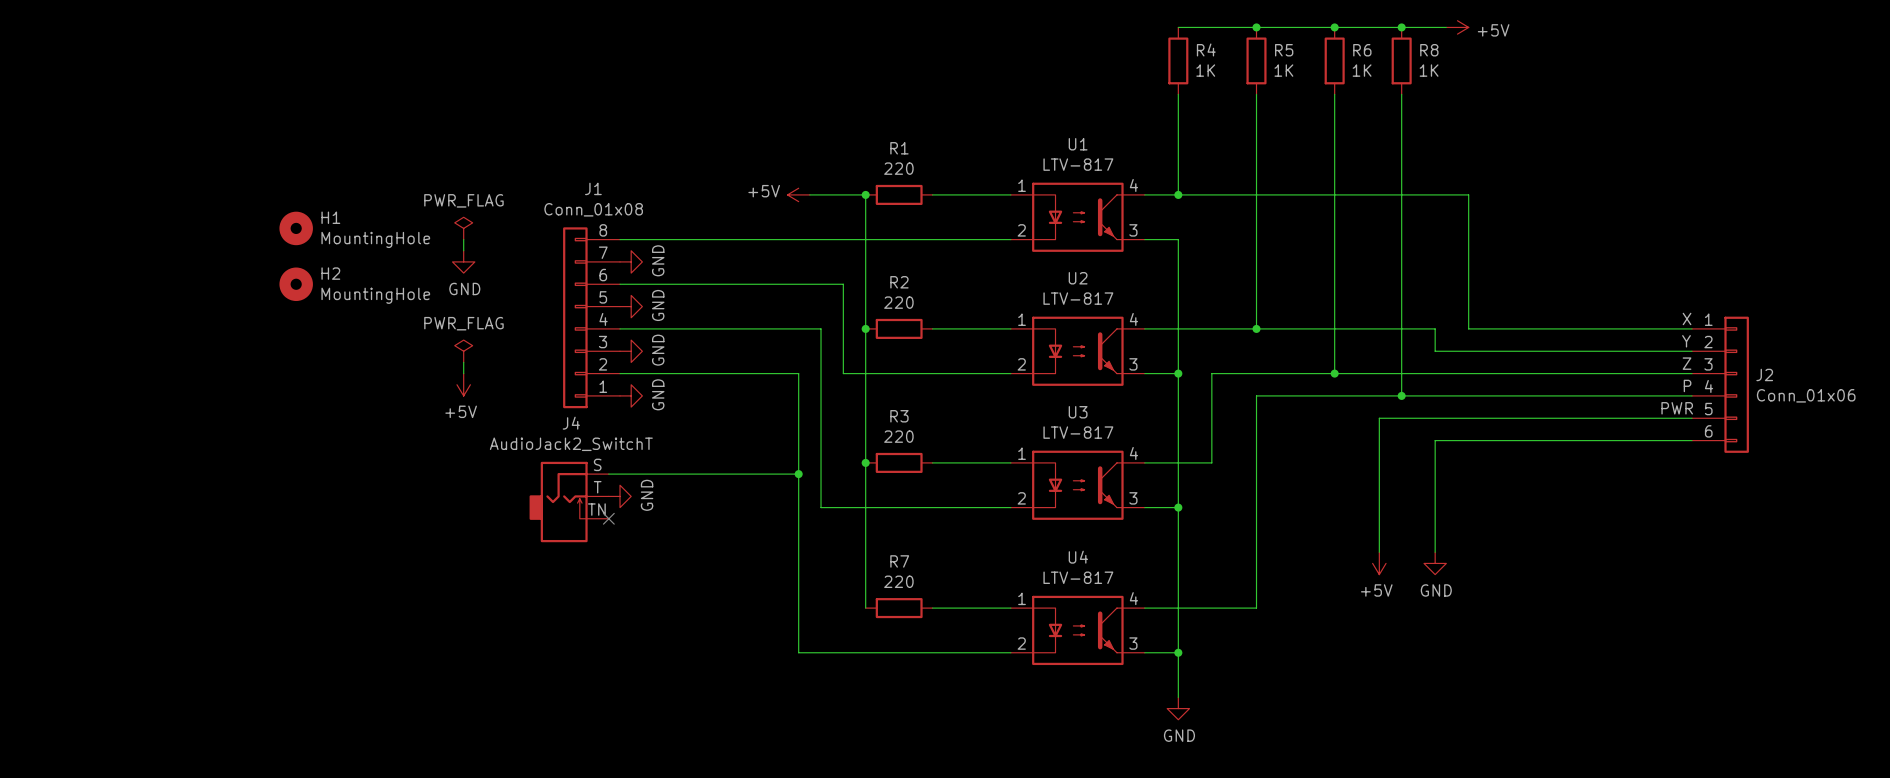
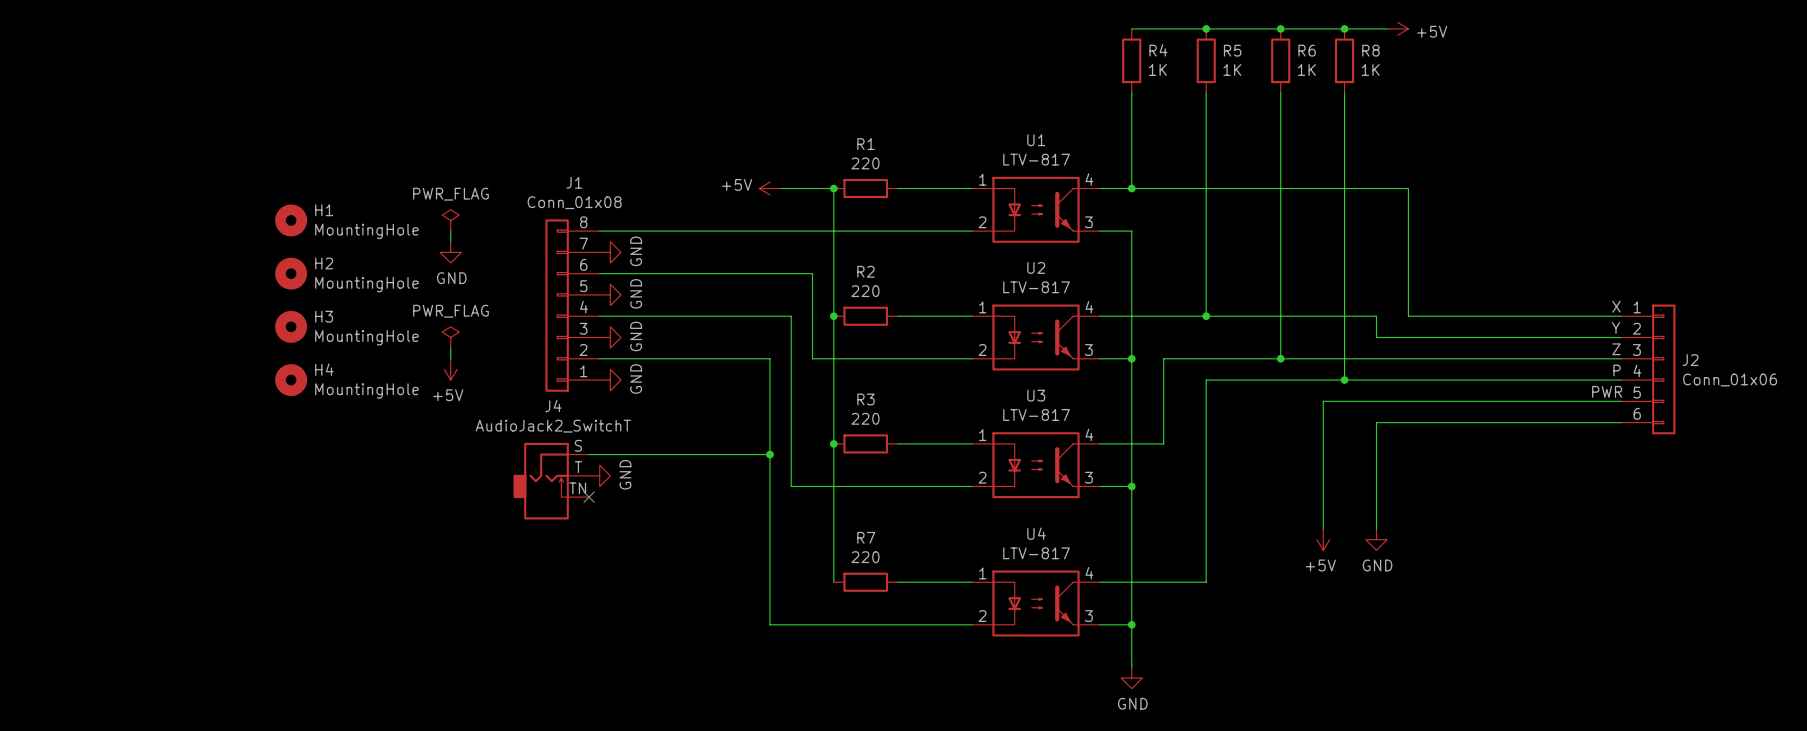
H3: none -> MountingHole (291, 326)
H4: none -> MountingHole (291, 380)

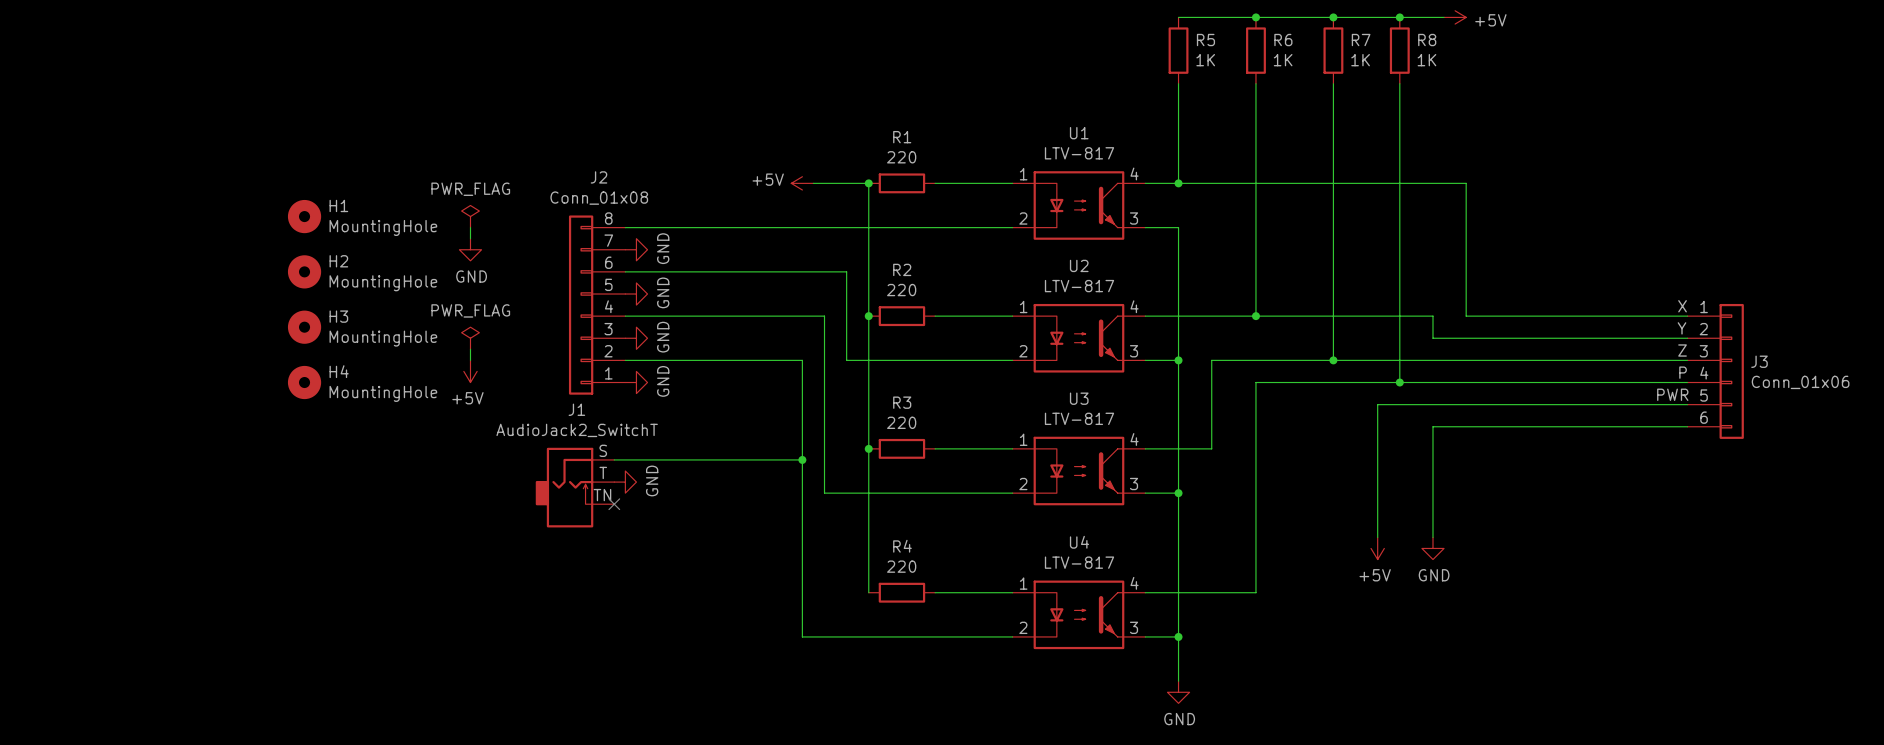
R4 name: R4 (1158, 50) -> R5 (1205, 40)
R5 name: R5 (1232, 50) -> R6 (1283, 40)
R6 name: R6 (1307, 50) -> R7 (1361, 40)
J1 name: J1 (574, 182) -> J2 (599, 177)
J2 name: J2 (1690, 360) -> J3 (1759, 361)
J4 name: J4 (553, 406) -> J1 (576, 409)
R7 name: R7 (866, 537) -> R4 (902, 546)

